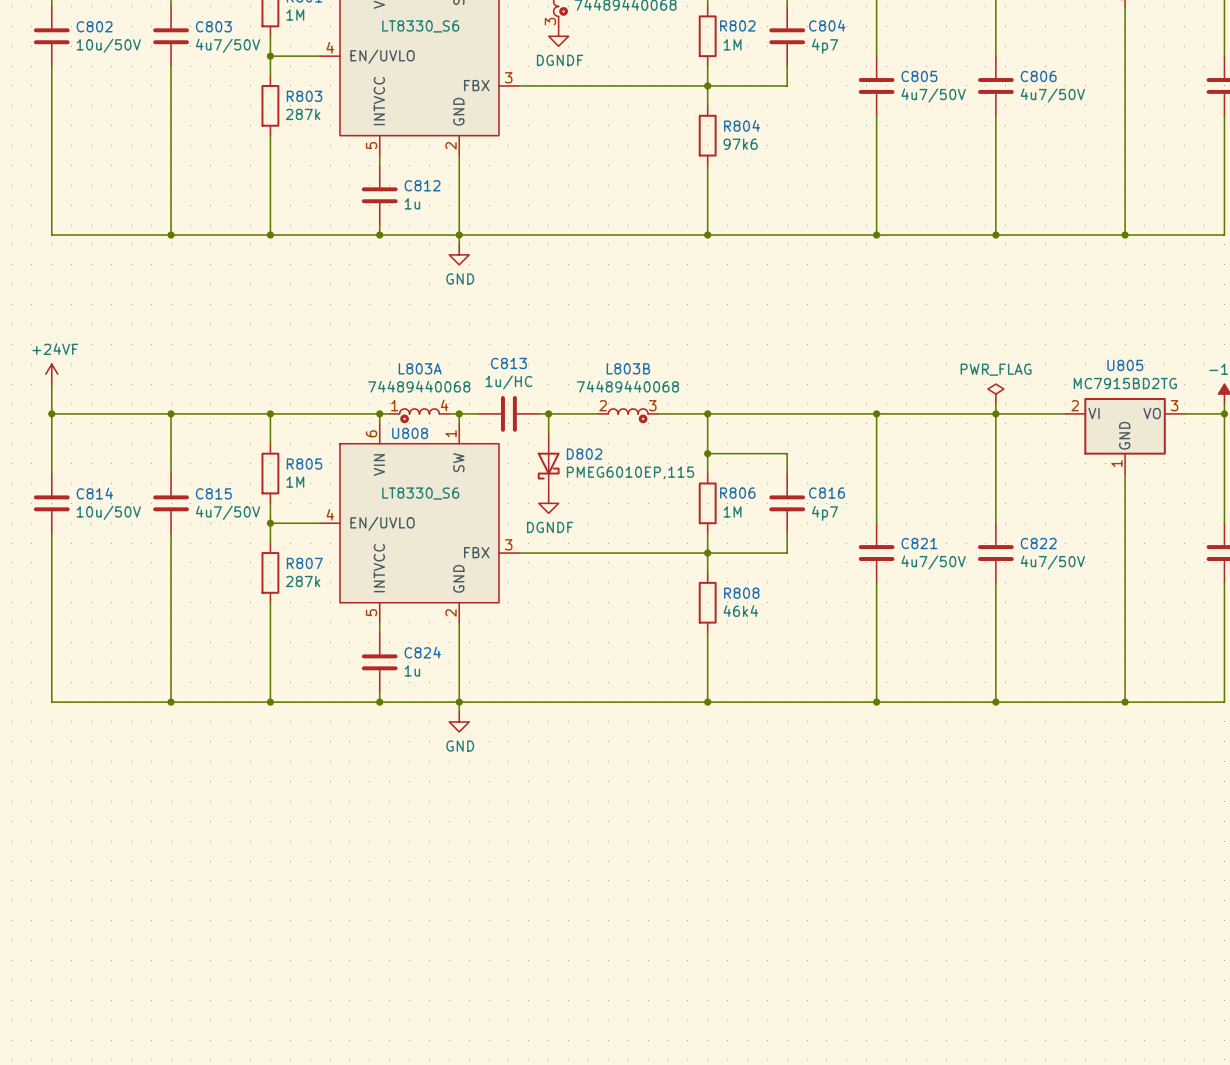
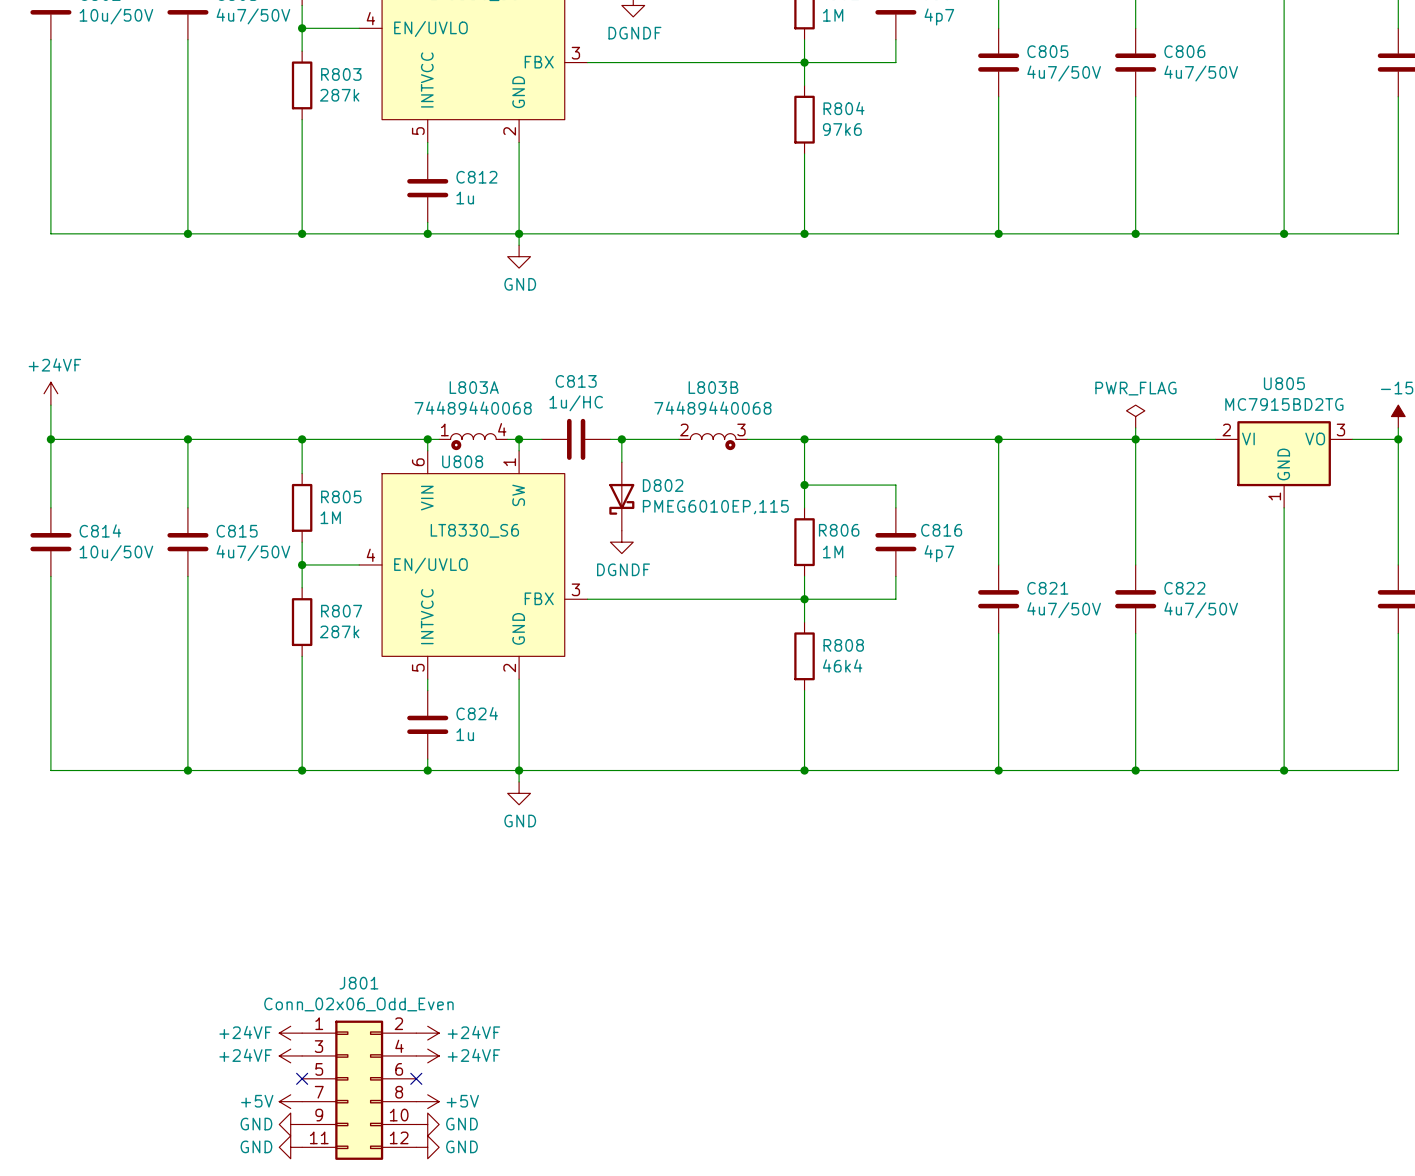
power symbol: none -> +24VF (290, 1033)
power symbol: none -> +24VF (427, 1033)
power symbol: none -> +24VF (290, 1055)
power symbol: none -> +24VF (427, 1055)
no-connect mark: none -> (302, 1078)
no-connect mark: none -> (416, 1078)
J801: none -> Conn_02x06_Odd_Even (359, 1090)
power symbol: none -> +5V (290, 1101)
power symbol: none -> +5V (427, 1101)
power symbol: none -> GND (290, 1124)
power symbol: none -> GND (427, 1124)
power symbol: none -> GND (290, 1147)
power symbol: none -> GND (427, 1147)

